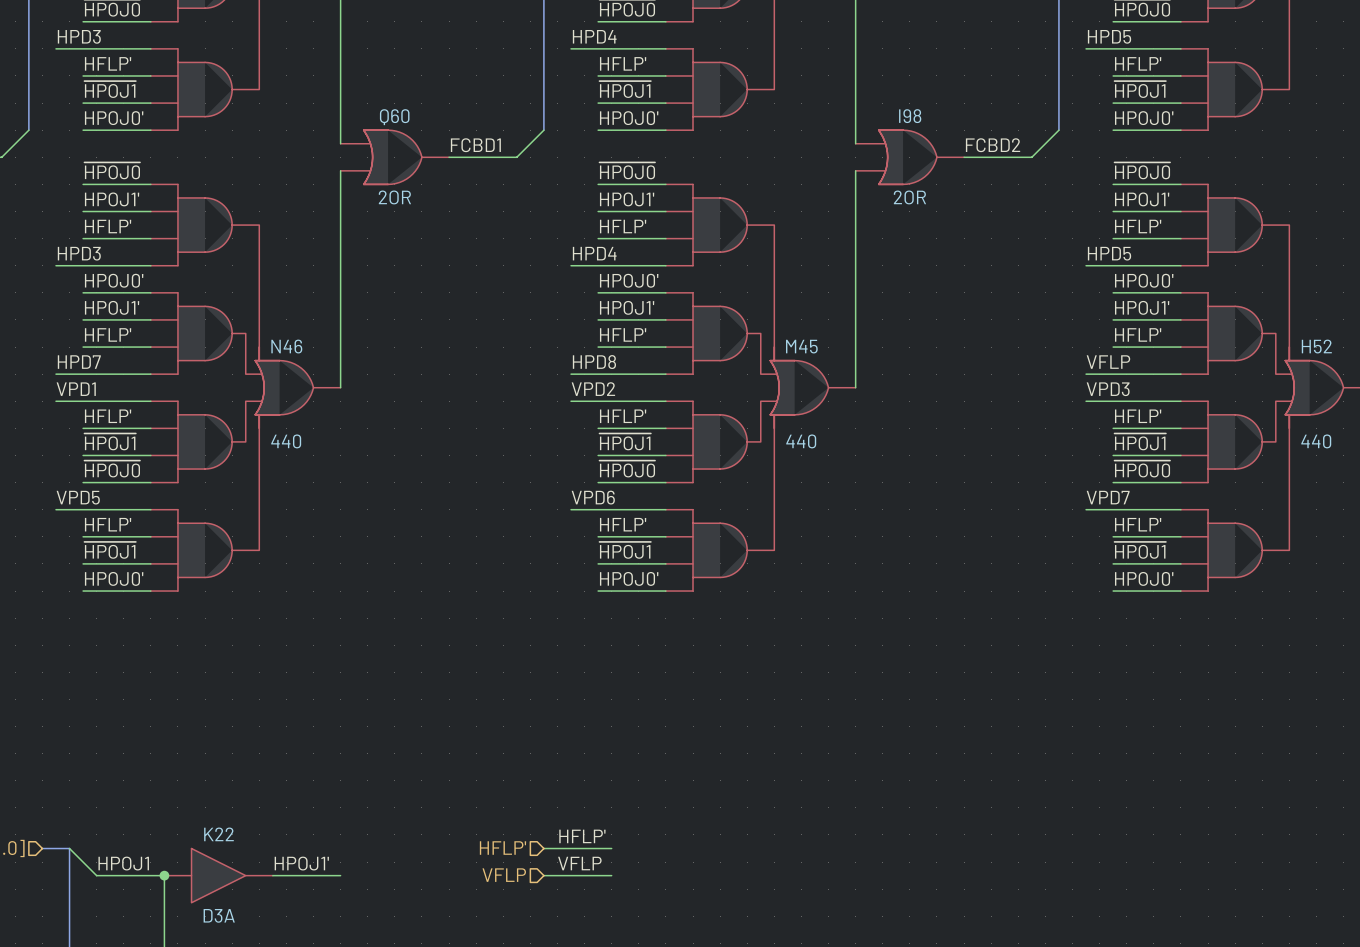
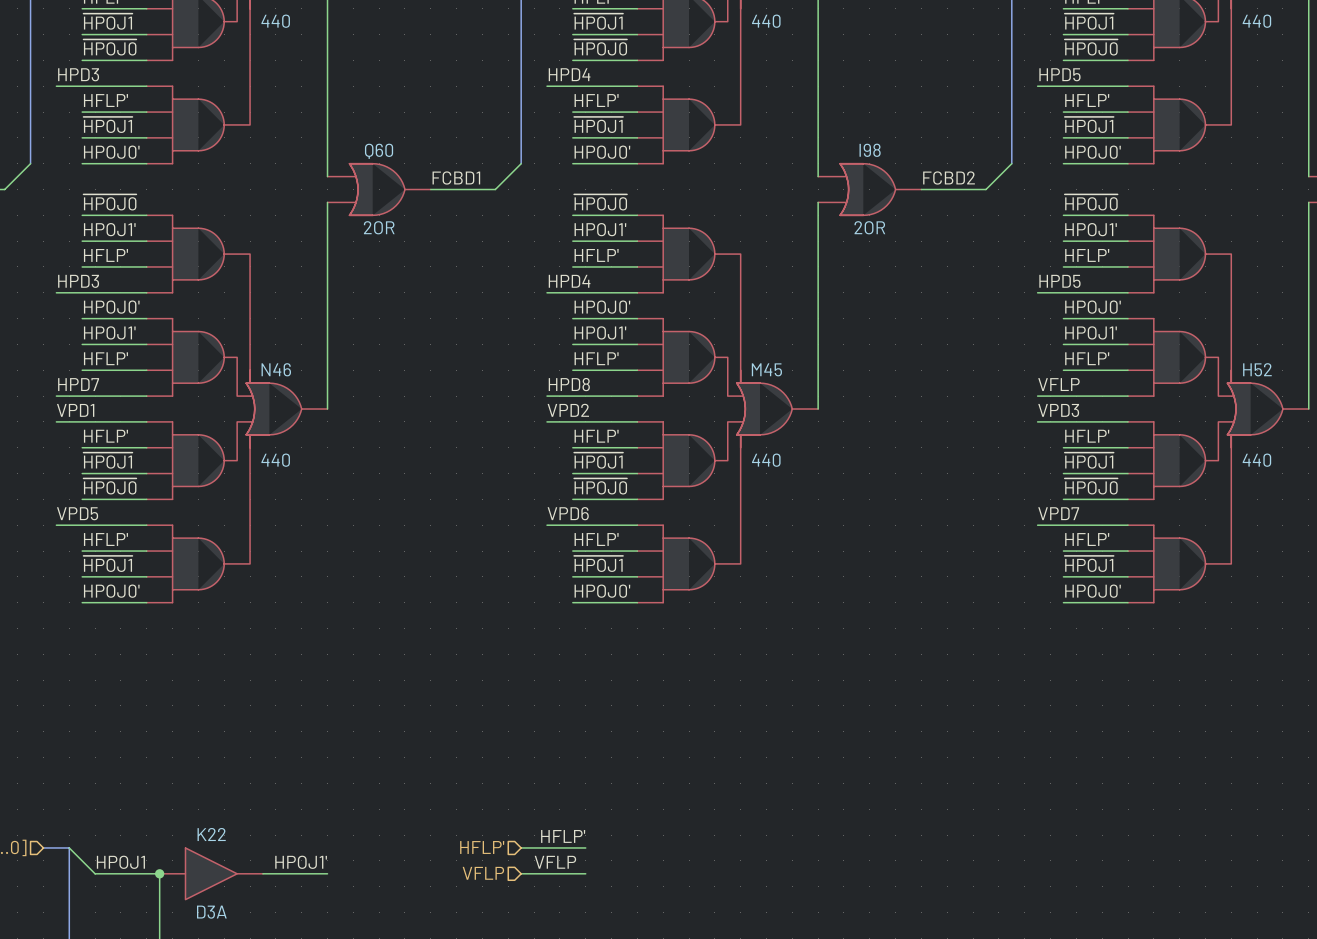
label position: HFLP' (582, 836) -> HFLP' (563, 836)
label position: HPOJ1' (301, 863) -> HPOJ1' (301, 862)

